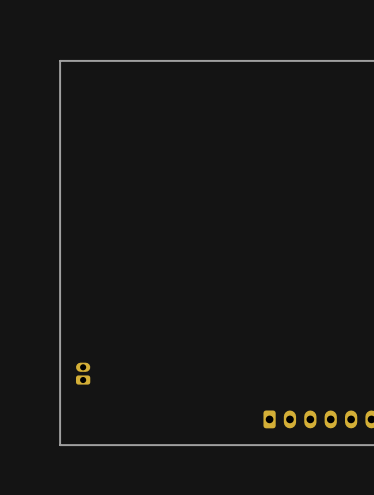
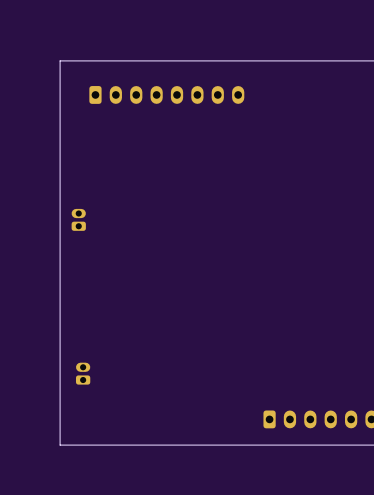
part: none -> (166, 94)
part: none -> (78, 219)

